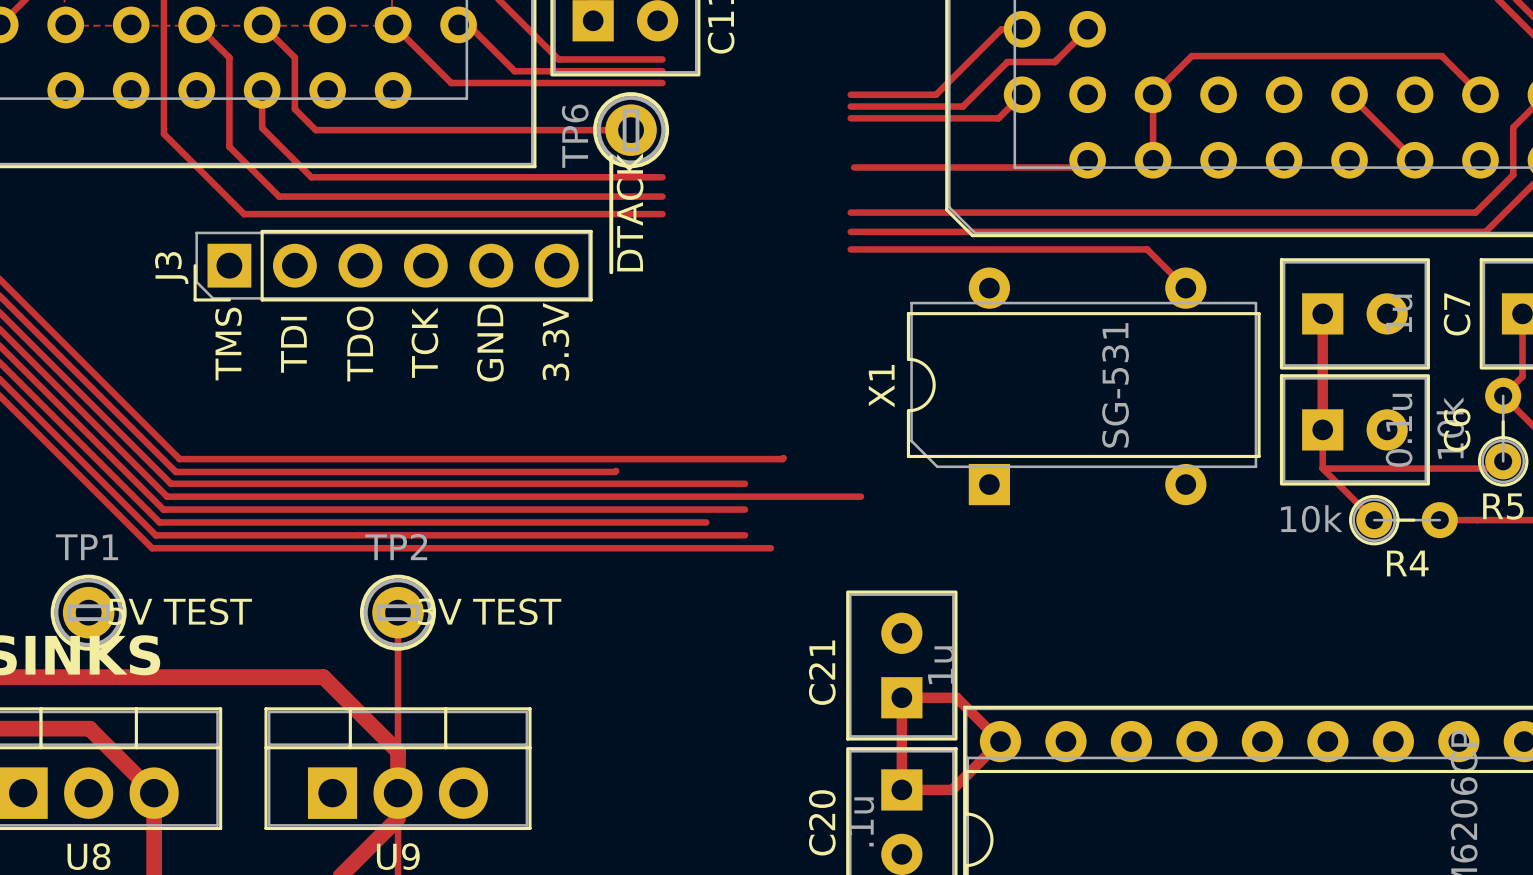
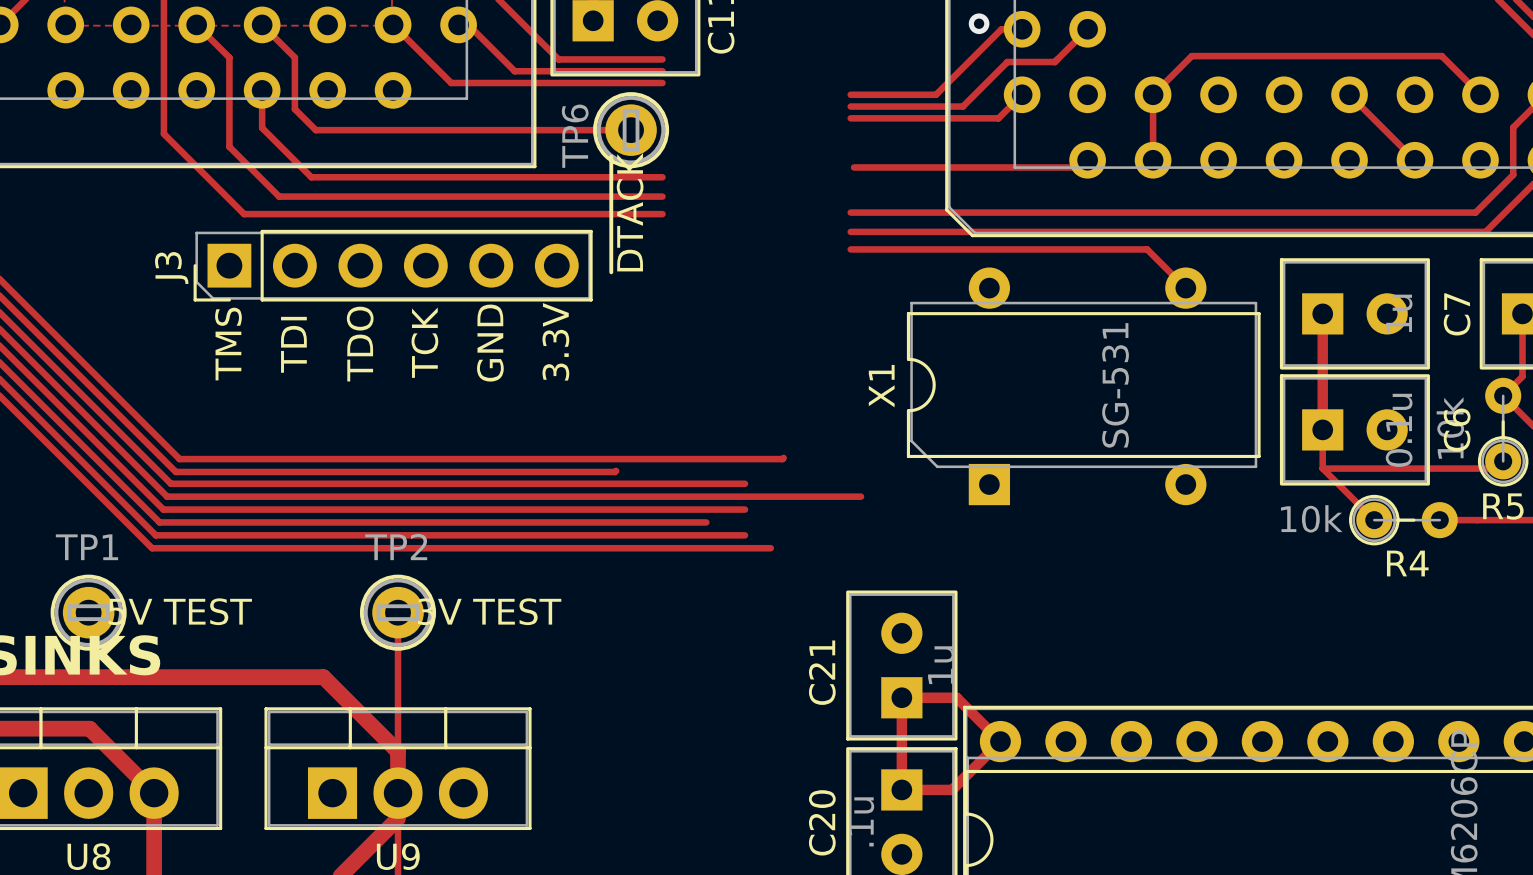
via: none -> (979, 23)

